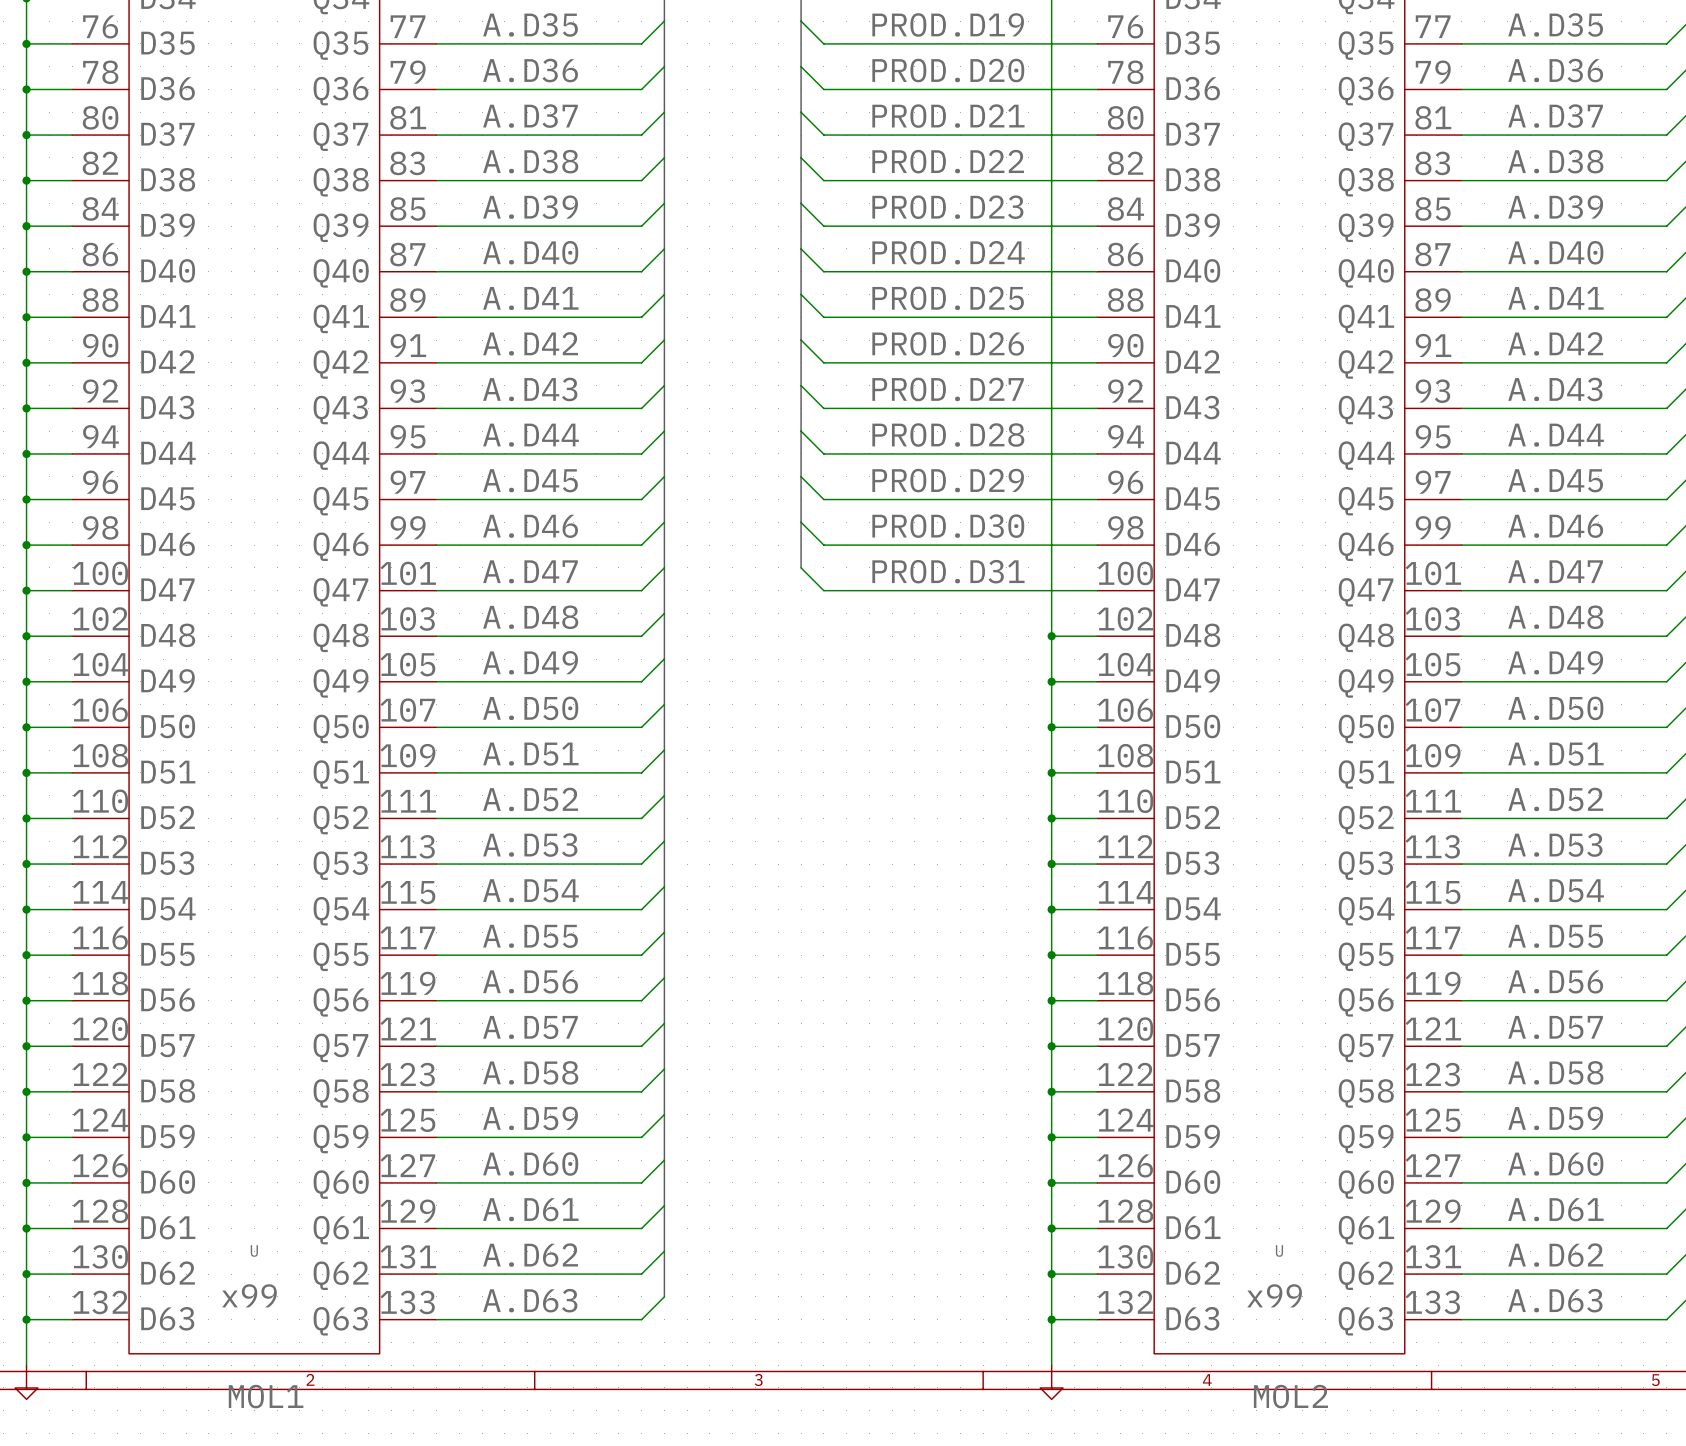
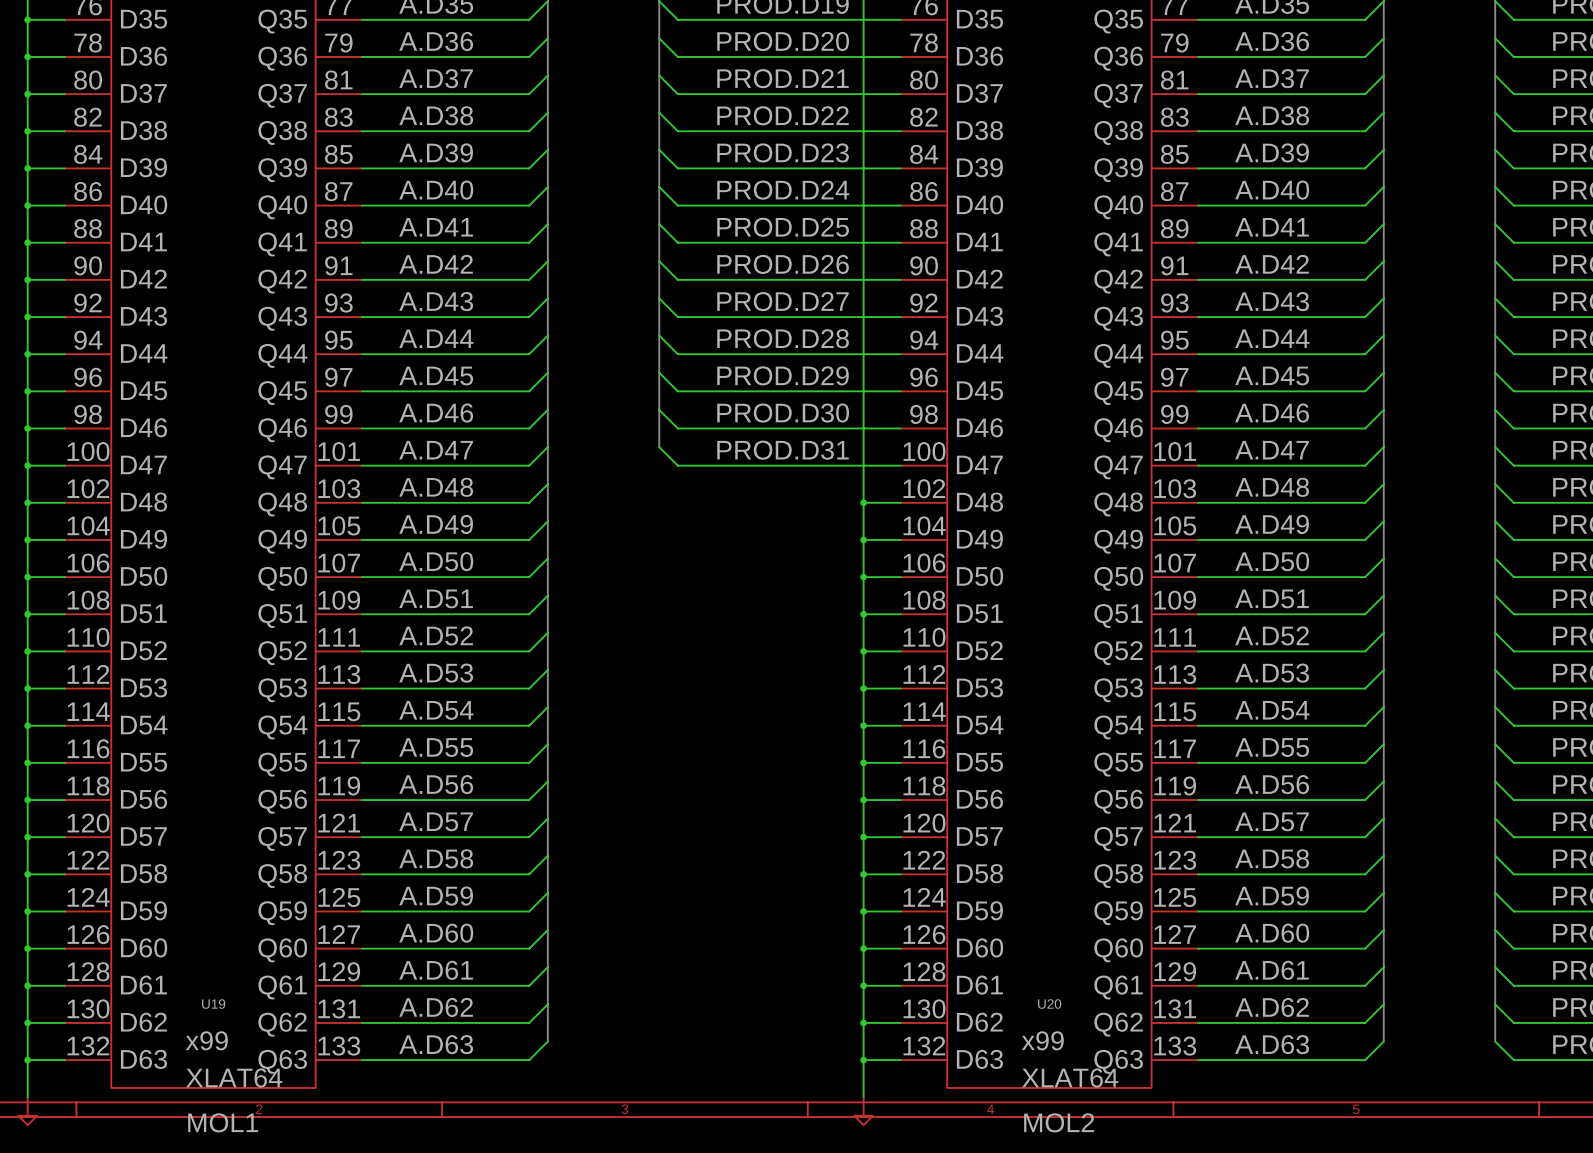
U name: U (254, 1250) -> U19 (213, 1004)
U name: U (1279, 1250) -> U20 (1049, 1004)
U value: none -> XLAT64 (234, 1077)
U value: none -> XLAT64 (1070, 1077)

